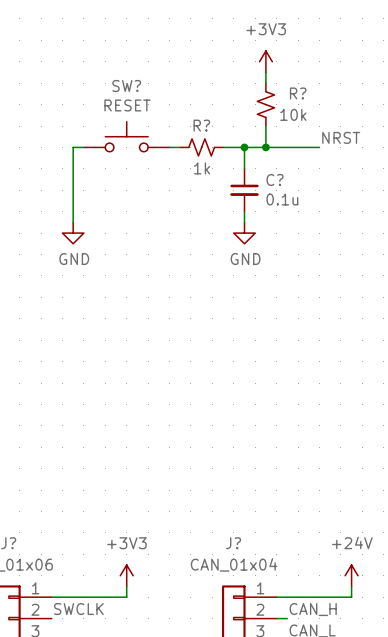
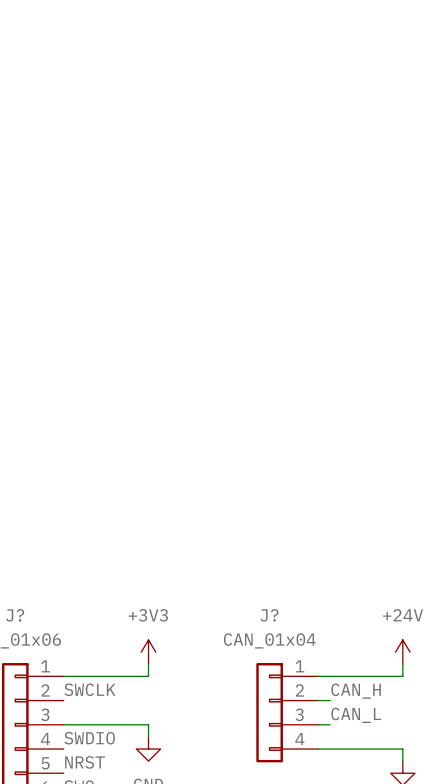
power symbol: +3V3 (265, 61) -> none
wire: (265, 72) (265, 83) -> none
R?: 10k (265, 104) -> none
wire: (265, 126) (265, 147) -> none
SW?: RESET (126, 136) -> none
label: NRST (341, 137) -> none
wire: (83, 147) (73, 147) (73, 222) -> none
wire: (169, 147) (180, 147) -> none
R?: 1k (201, 147) -> none
wire: (223, 147) (319, 147) -> none
wire: (244, 147) (244, 168) -> none
junction: (244, 147) -> none
junction: (265, 147) -> none
C?: 0.1u (244, 190) -> none
wire: (244, 211) (244, 222) -> none
power symbol: GND (73, 233) -> none
power symbol: GND (244, 233) -> none

